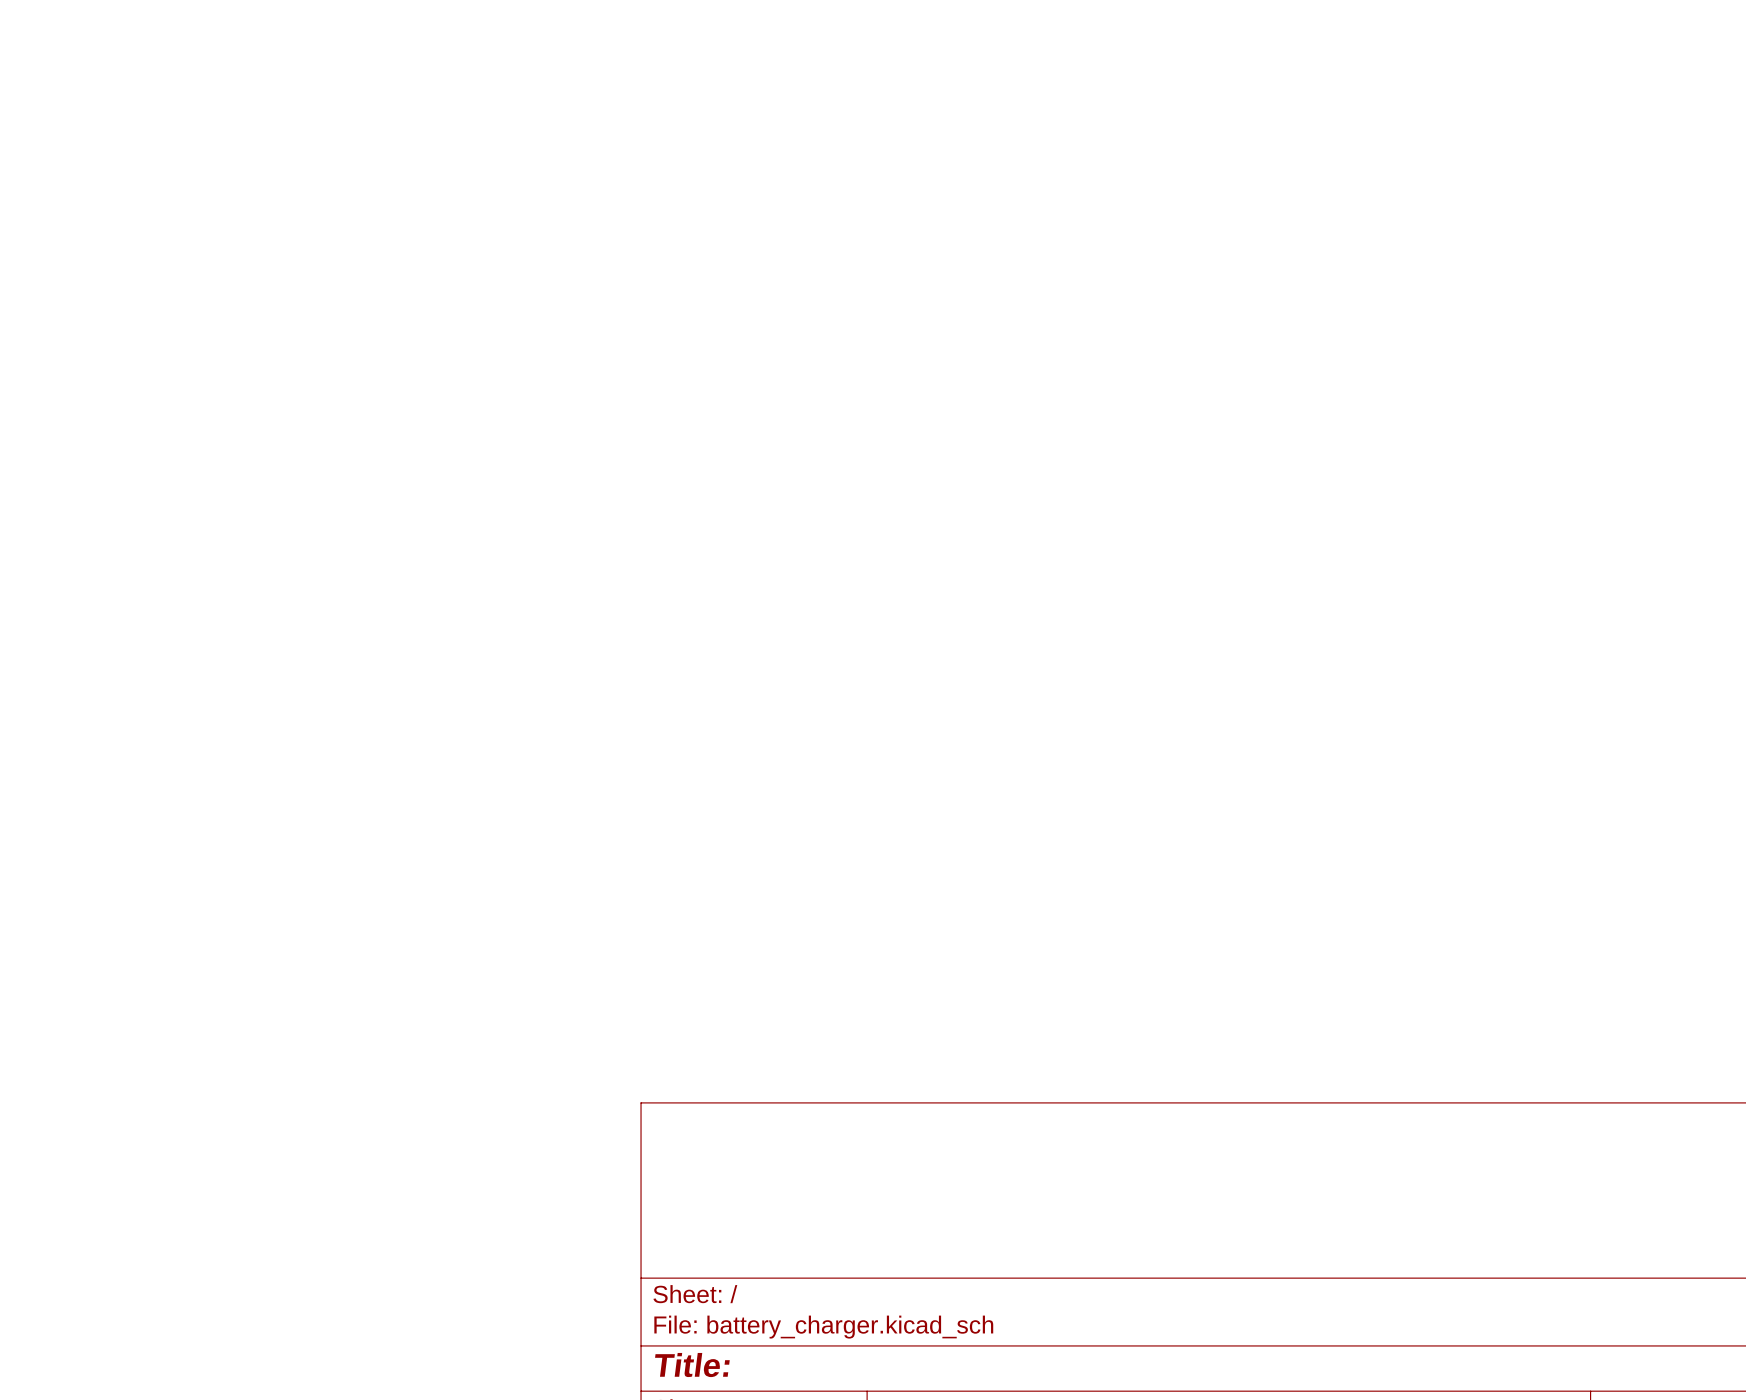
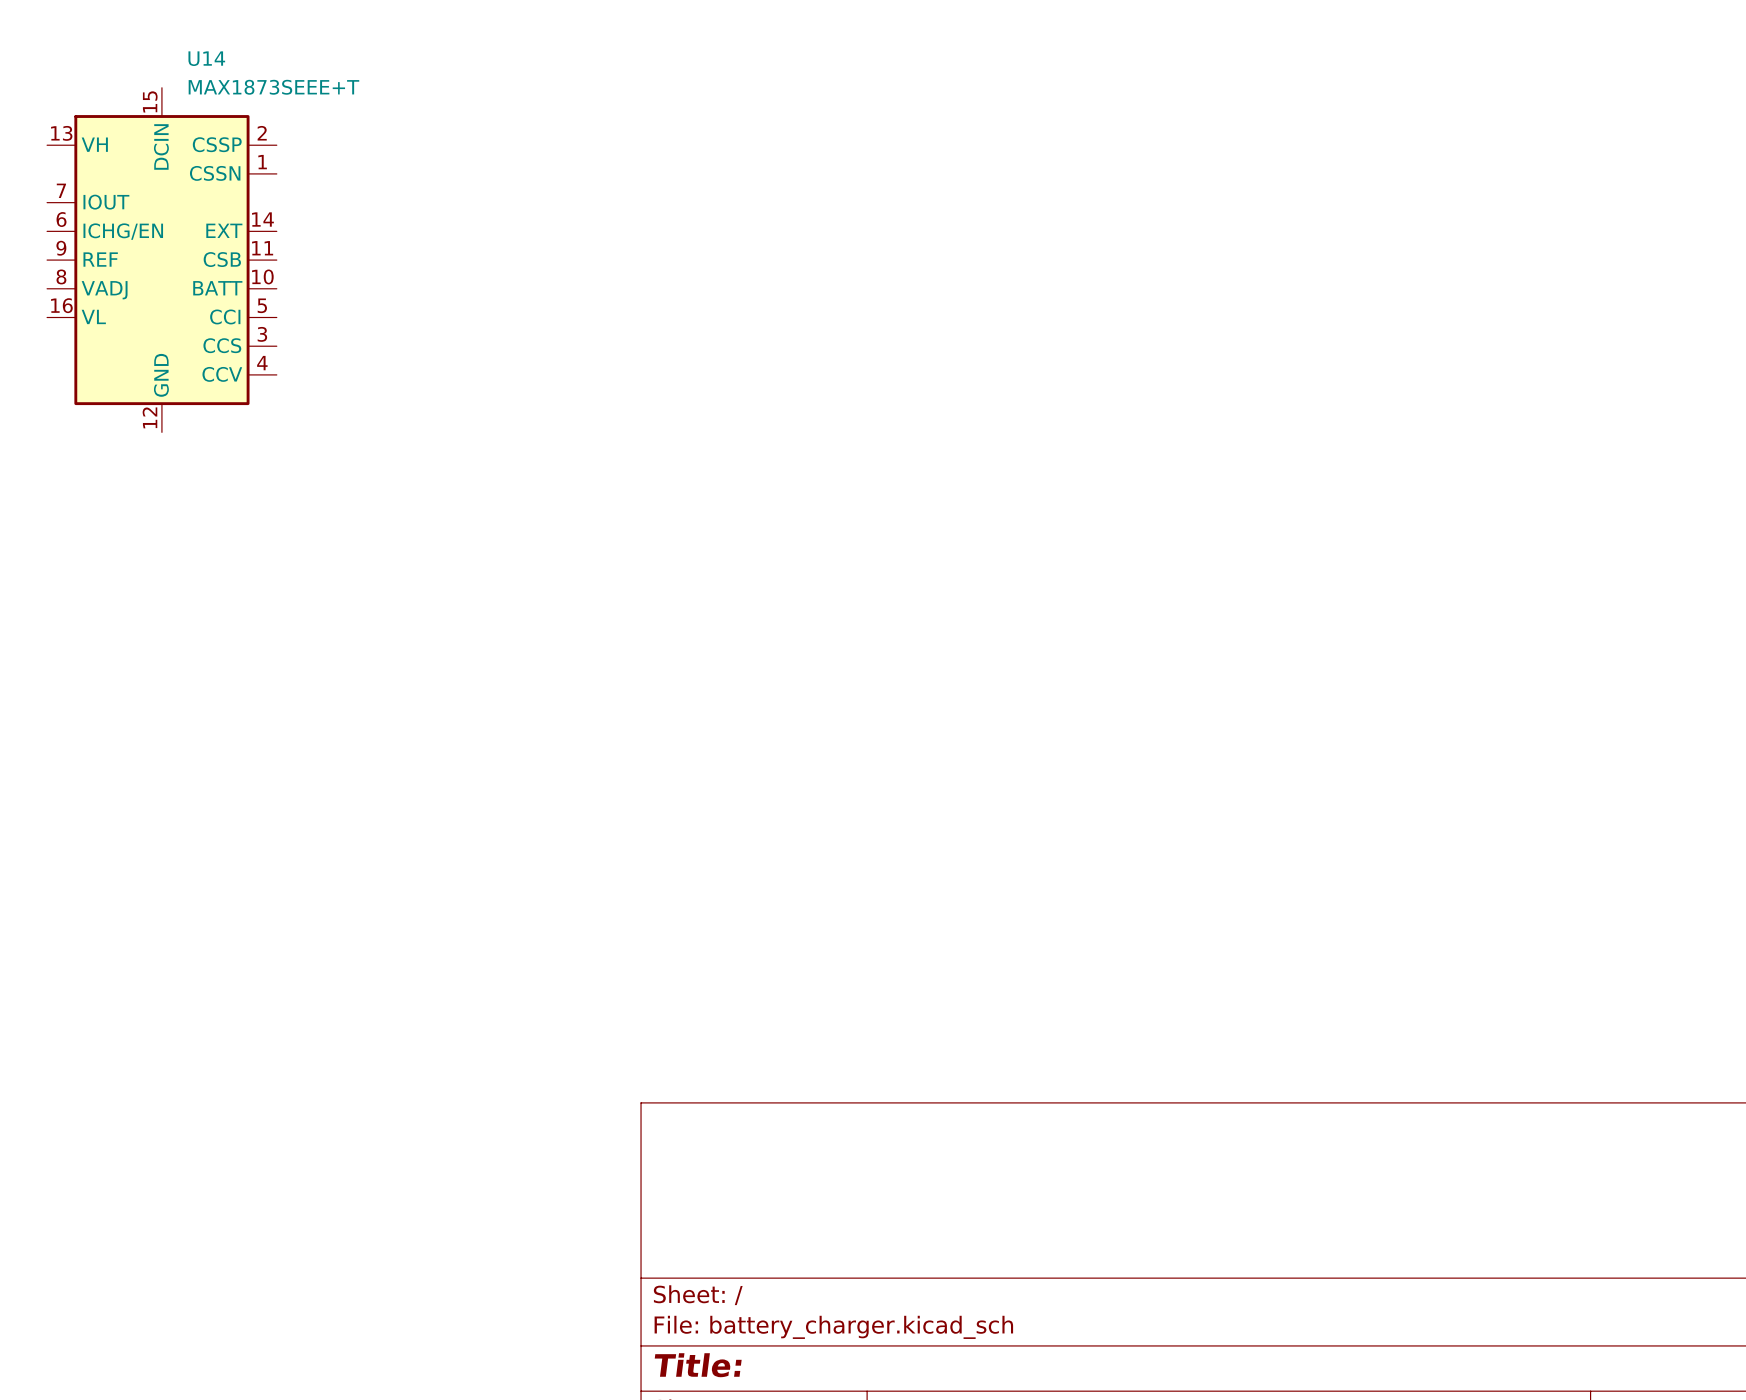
U14: none -> MAX1873SEEE+T (161, 260)

